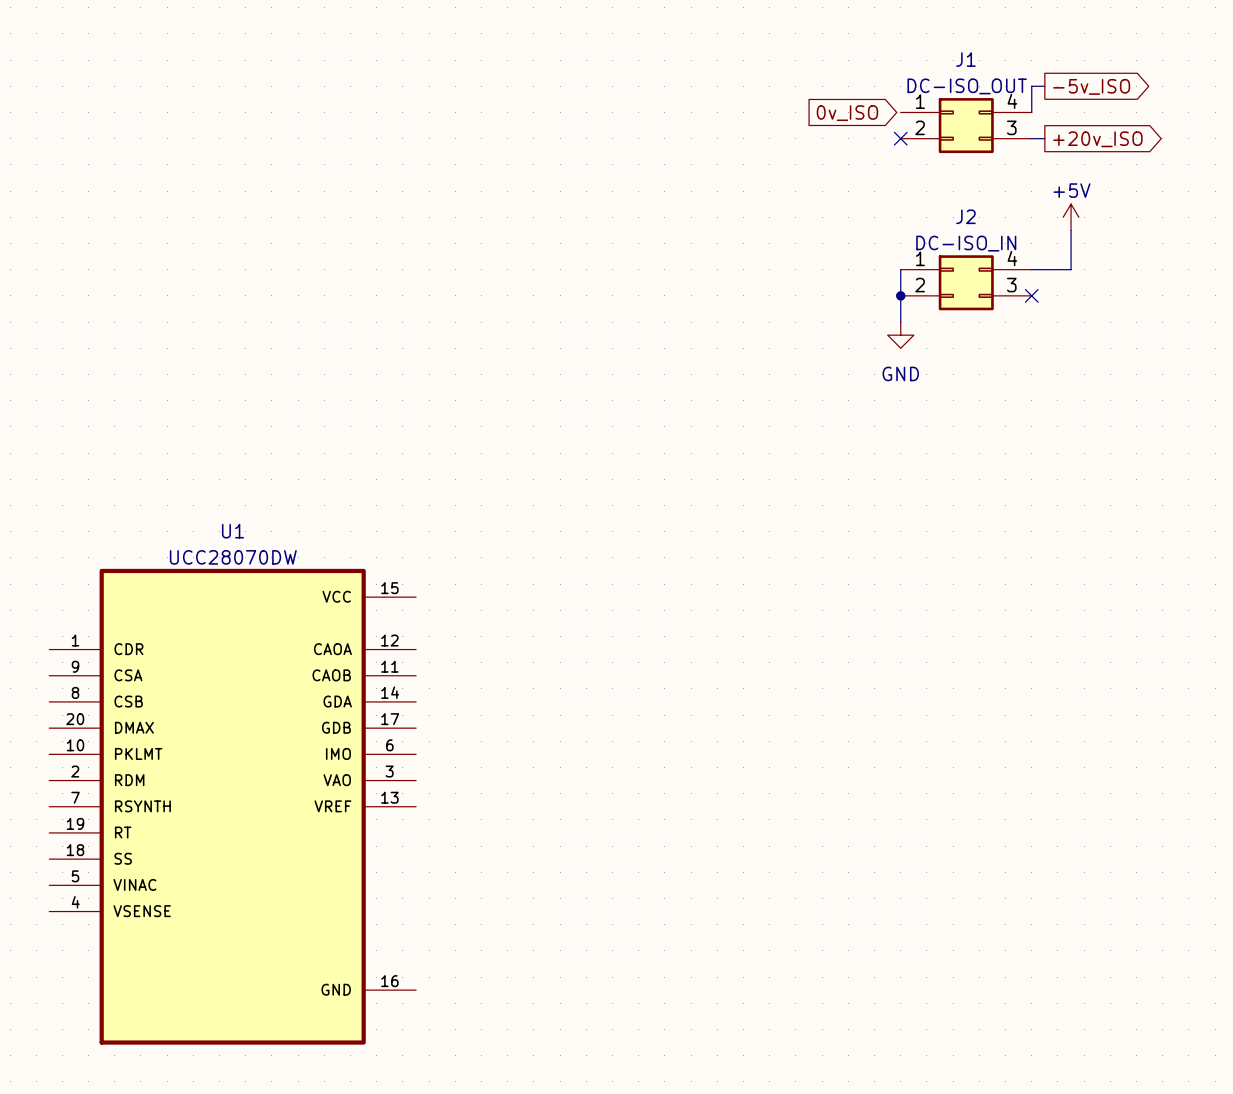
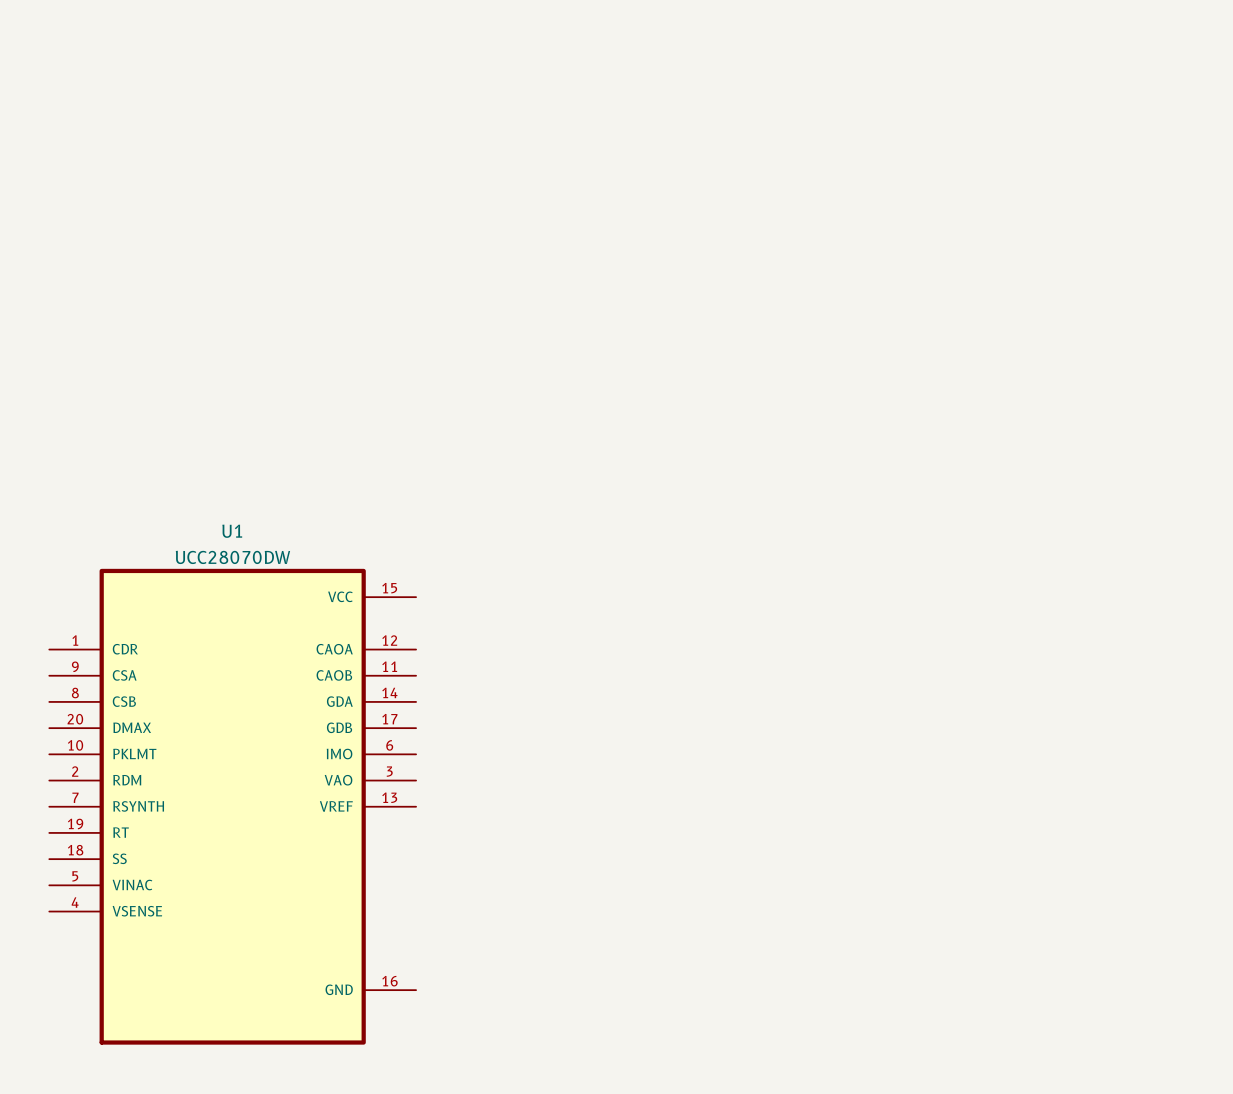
wire: (1044, 86) (1031, 86) (1031, 112) -> none
global label: -5v_ISO (1091, 86) -> none
global label: 0v_ISO (847, 113) -> none
J1: DC-ISO_OUT (966, 125) -> none
no-connect mark: (900, 138) -> none
wire: (1031, 138) (1044, 138) -> none
global label: +20v_ISO (1097, 139) -> none
power symbol: +5V (1071, 217) -> none
wire: (1071, 230) (1071, 269) (1031, 269) -> none
wire: (900, 269) (900, 322) -> none
J2: DC-ISO_IN (966, 282) -> none
junction: (900, 295) -> none
no-connect mark: (1031, 295) -> none
power symbol: GND (900, 335) -> none

